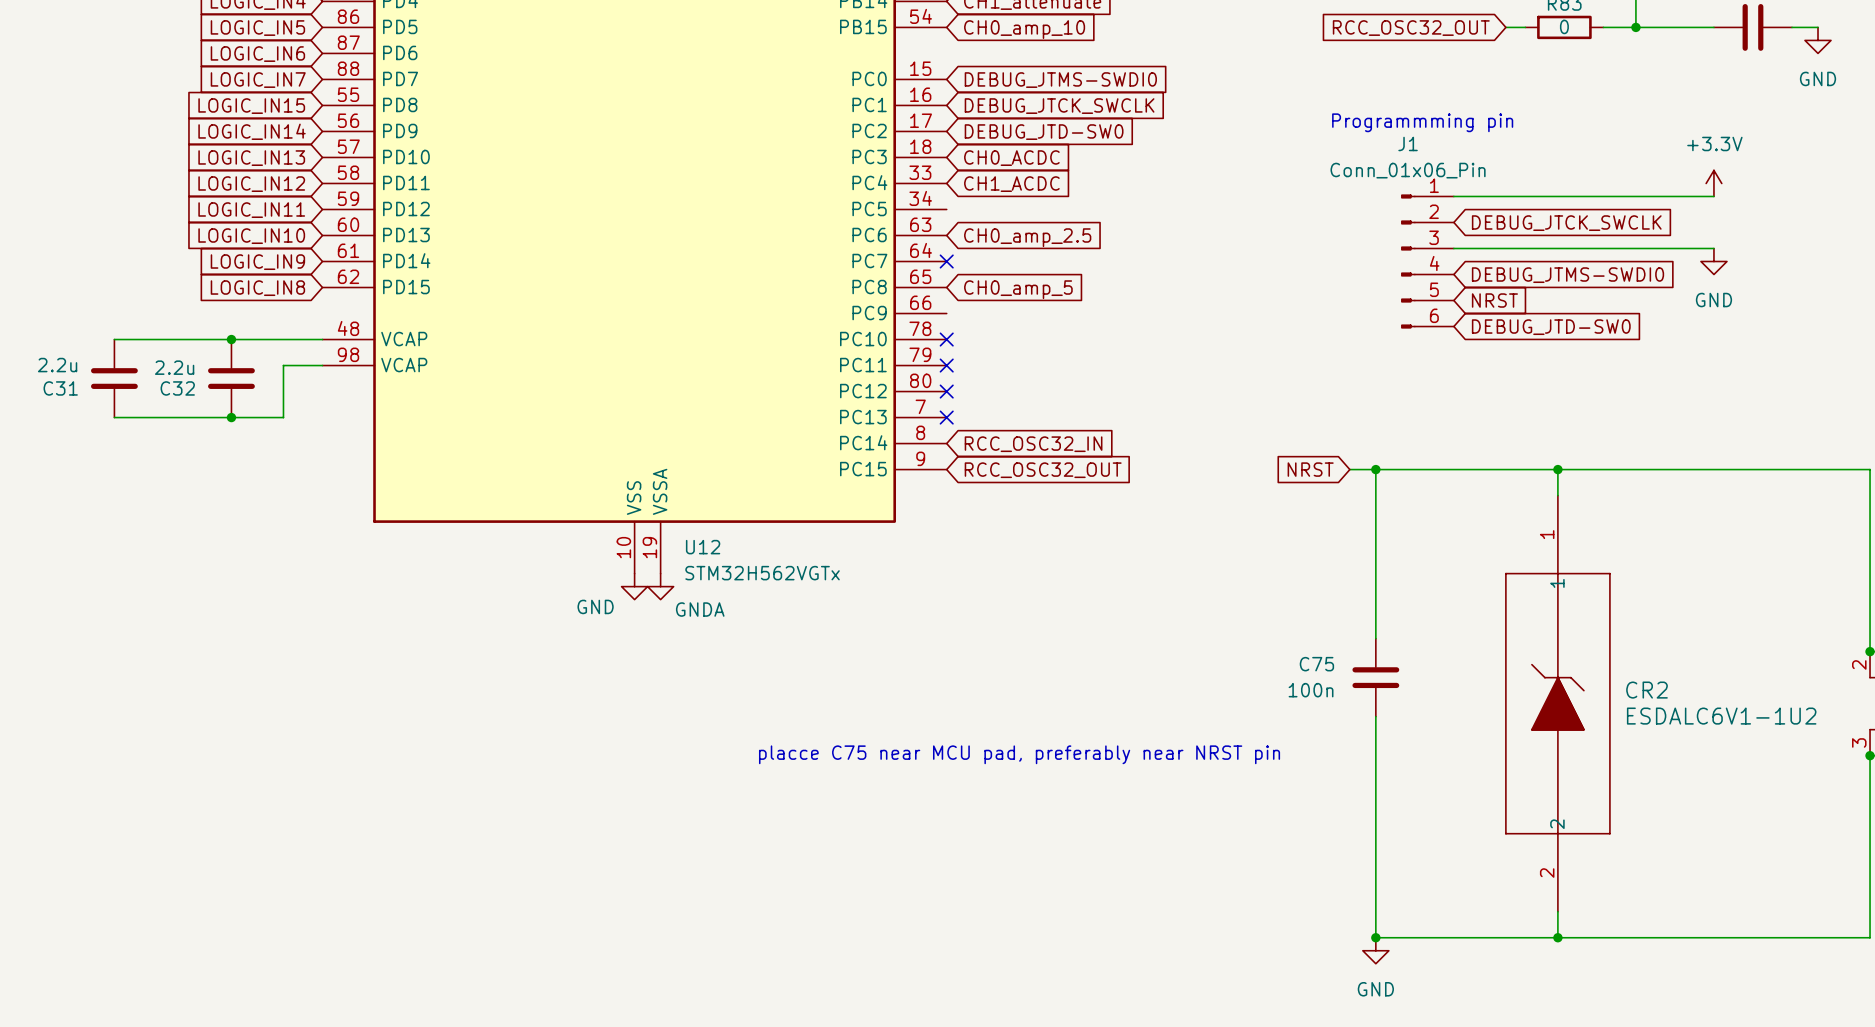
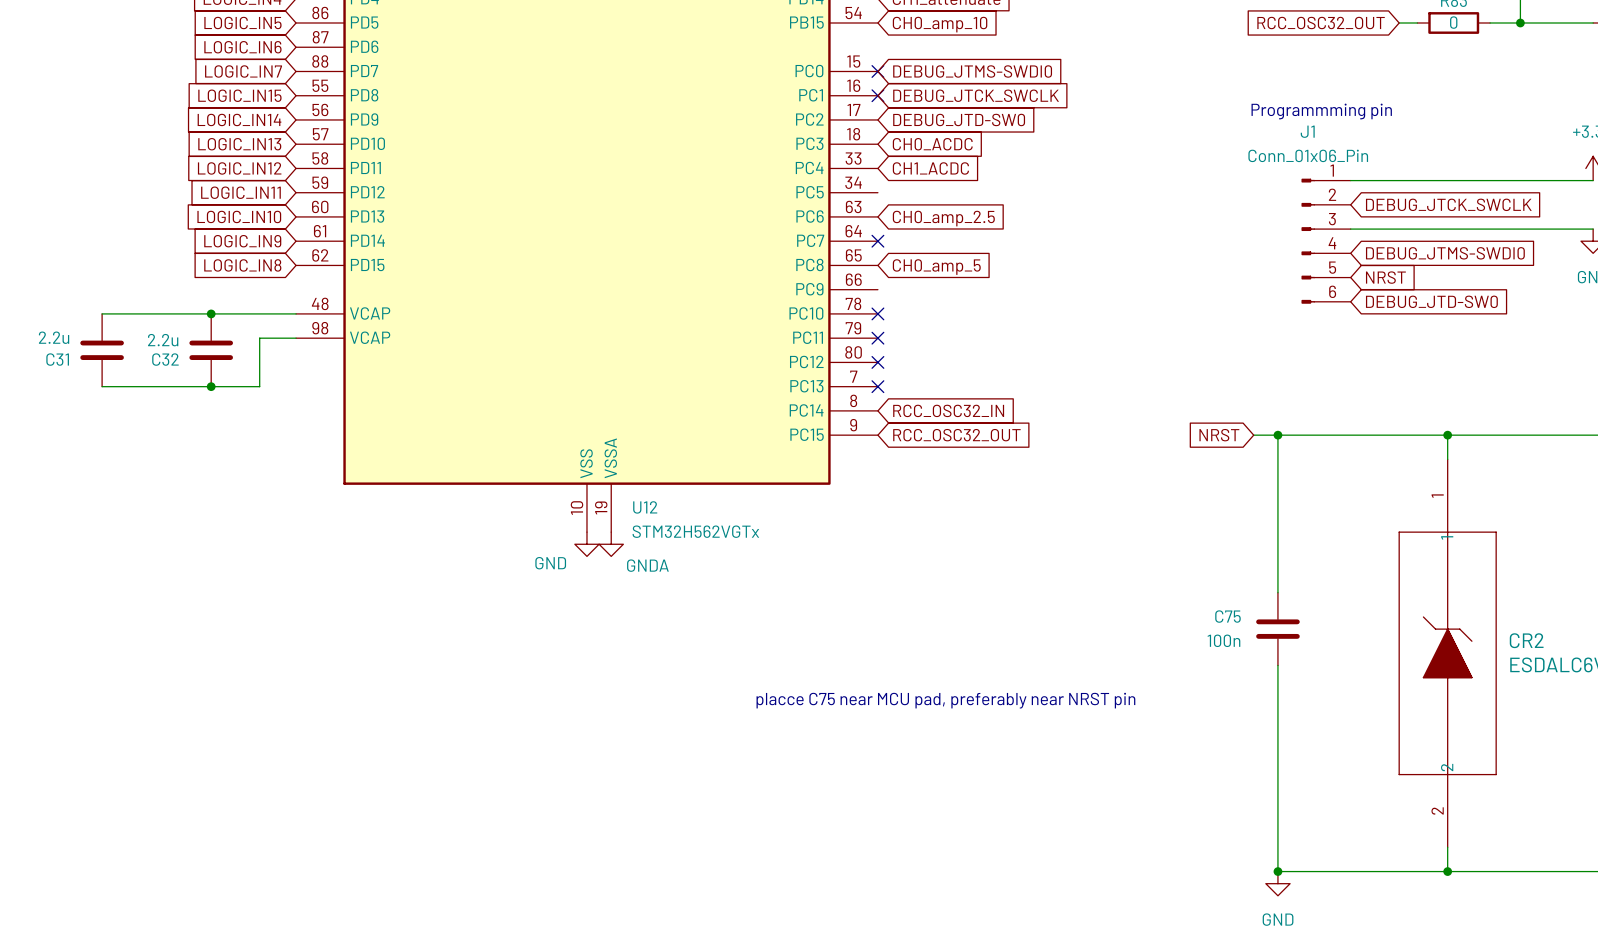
no-connect mark: none -> (877, 71)
no-connect mark: none -> (877, 95)

